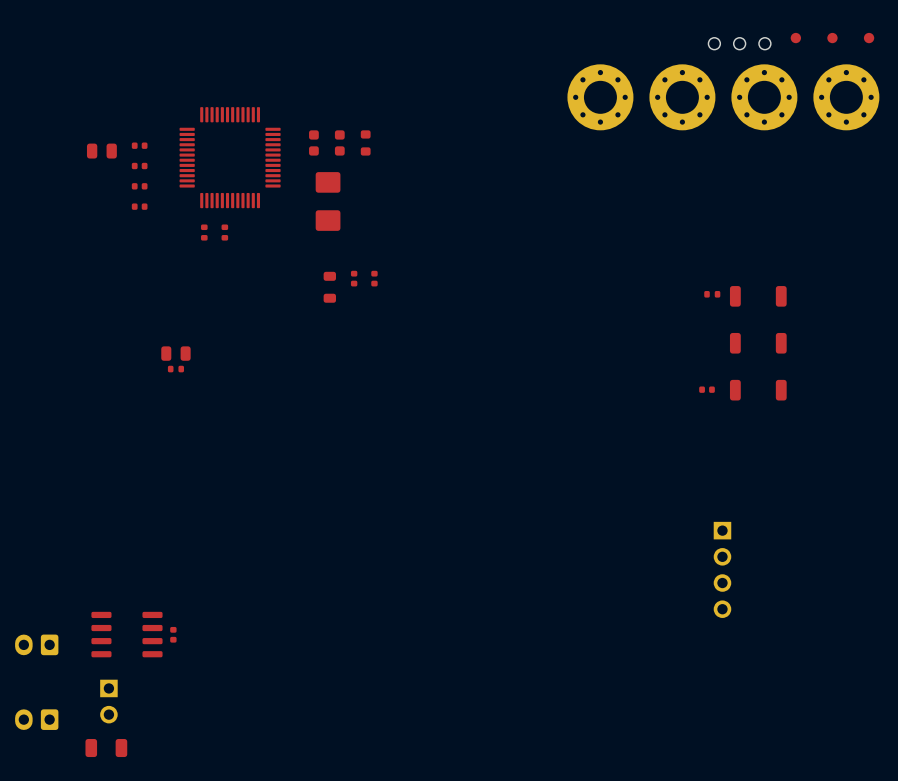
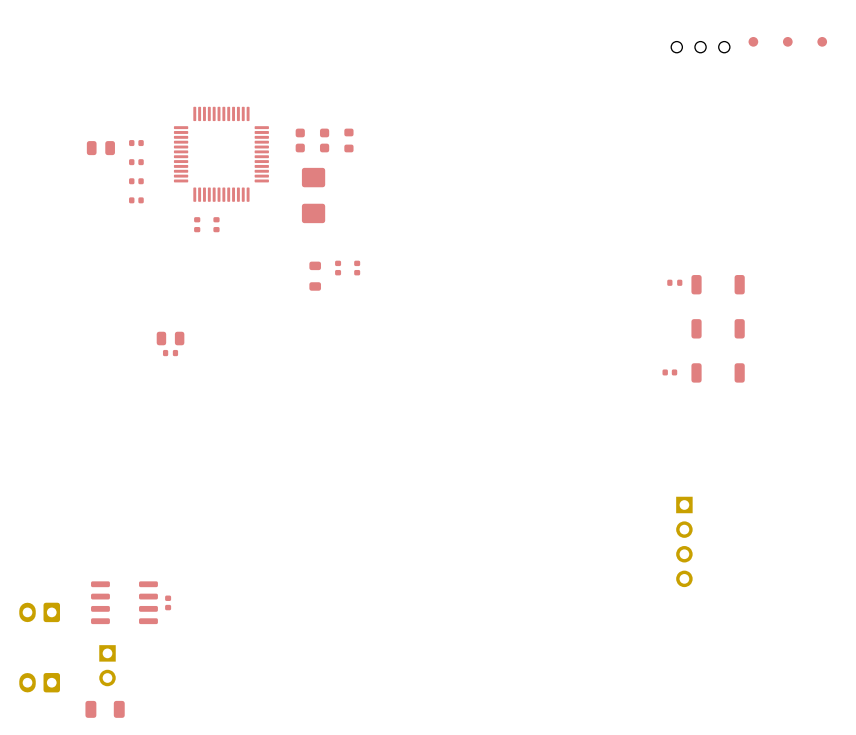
part: (600, 97) -> none
part: (682, 97) -> none
part: (764, 97) -> none
part: (846, 97) -> none

